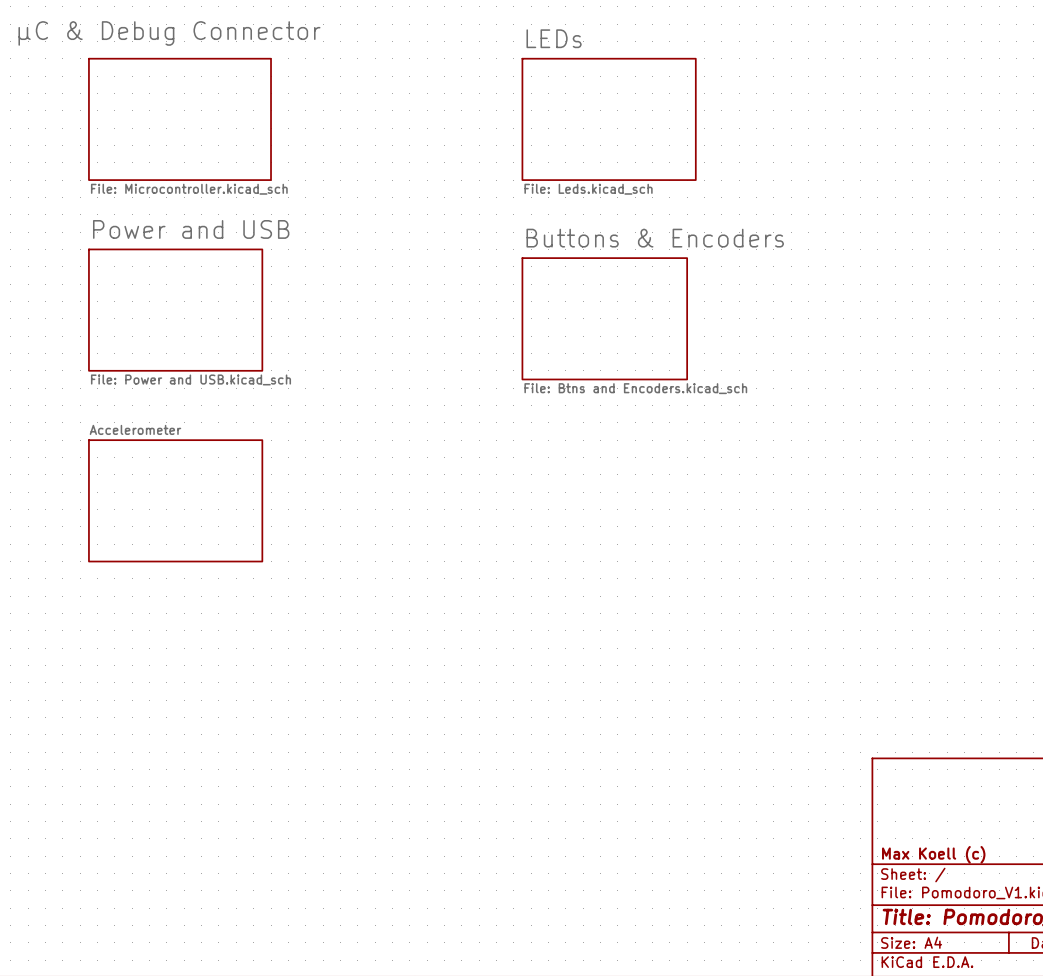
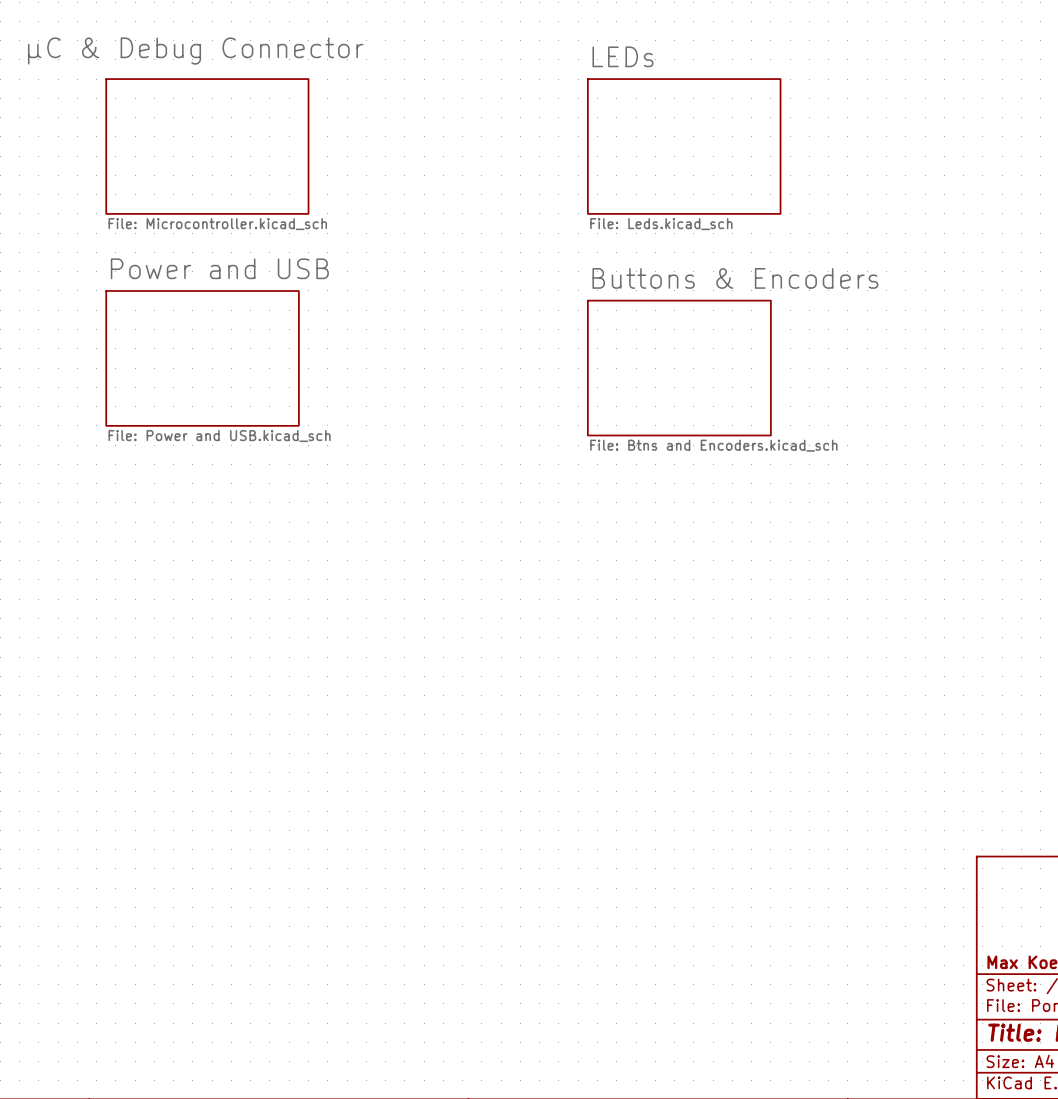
sheet Accelerometer: (175, 500) -> none

